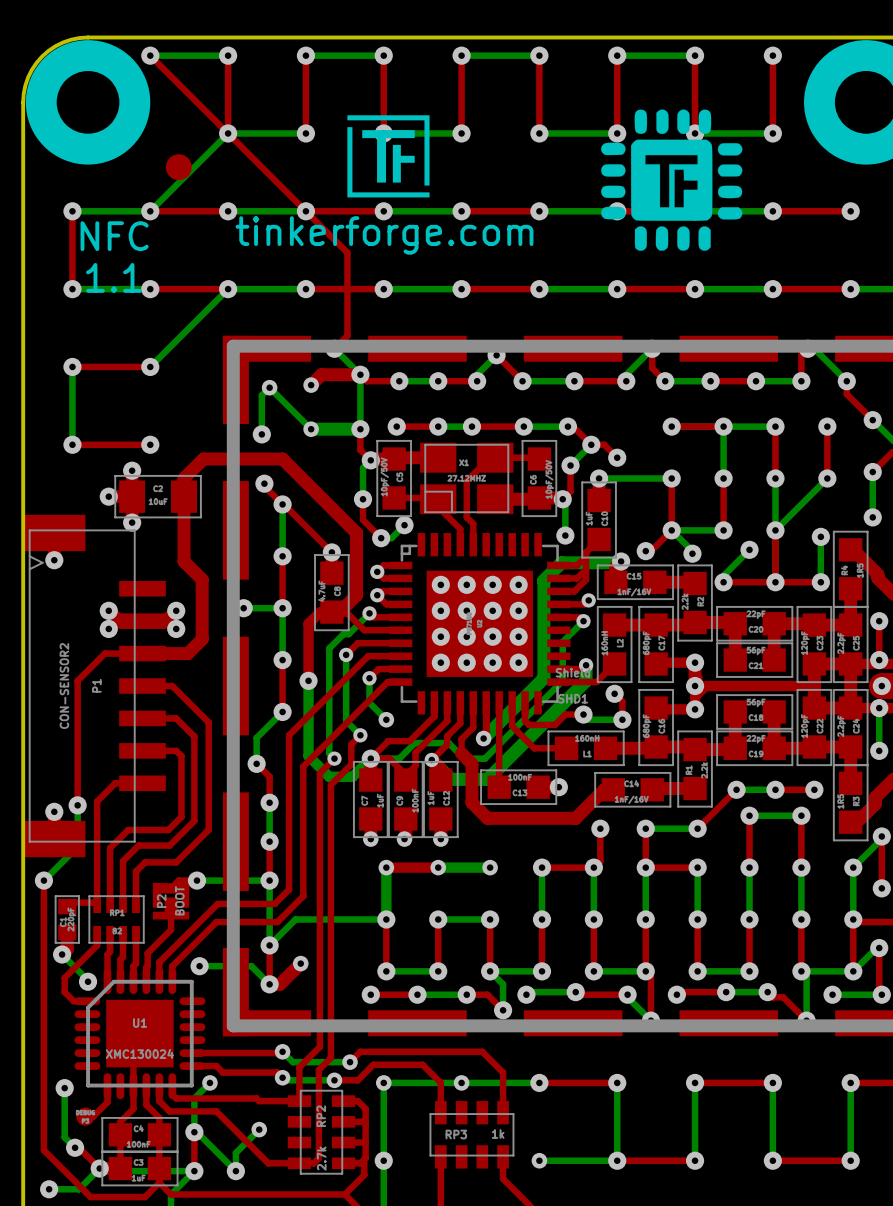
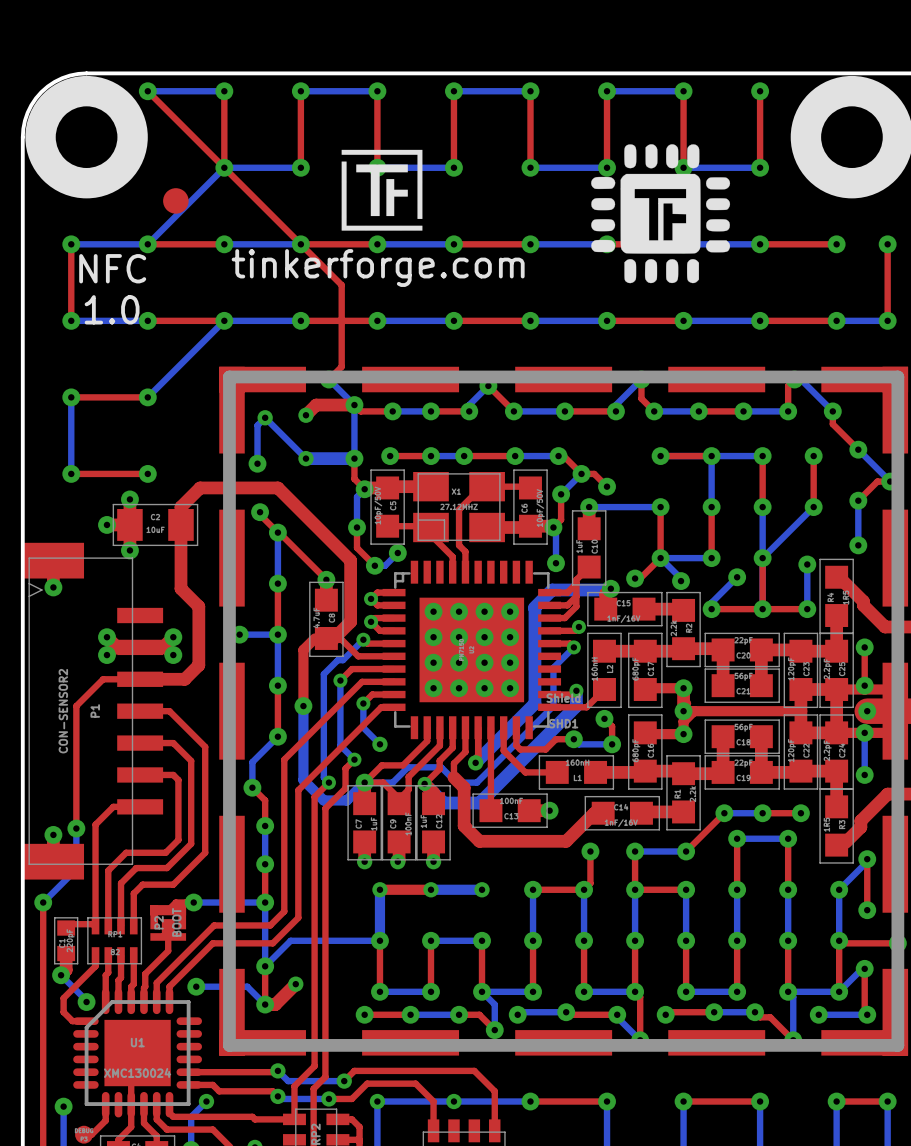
text: 1.1 (113, 277) -> 1.0 (112, 309)

